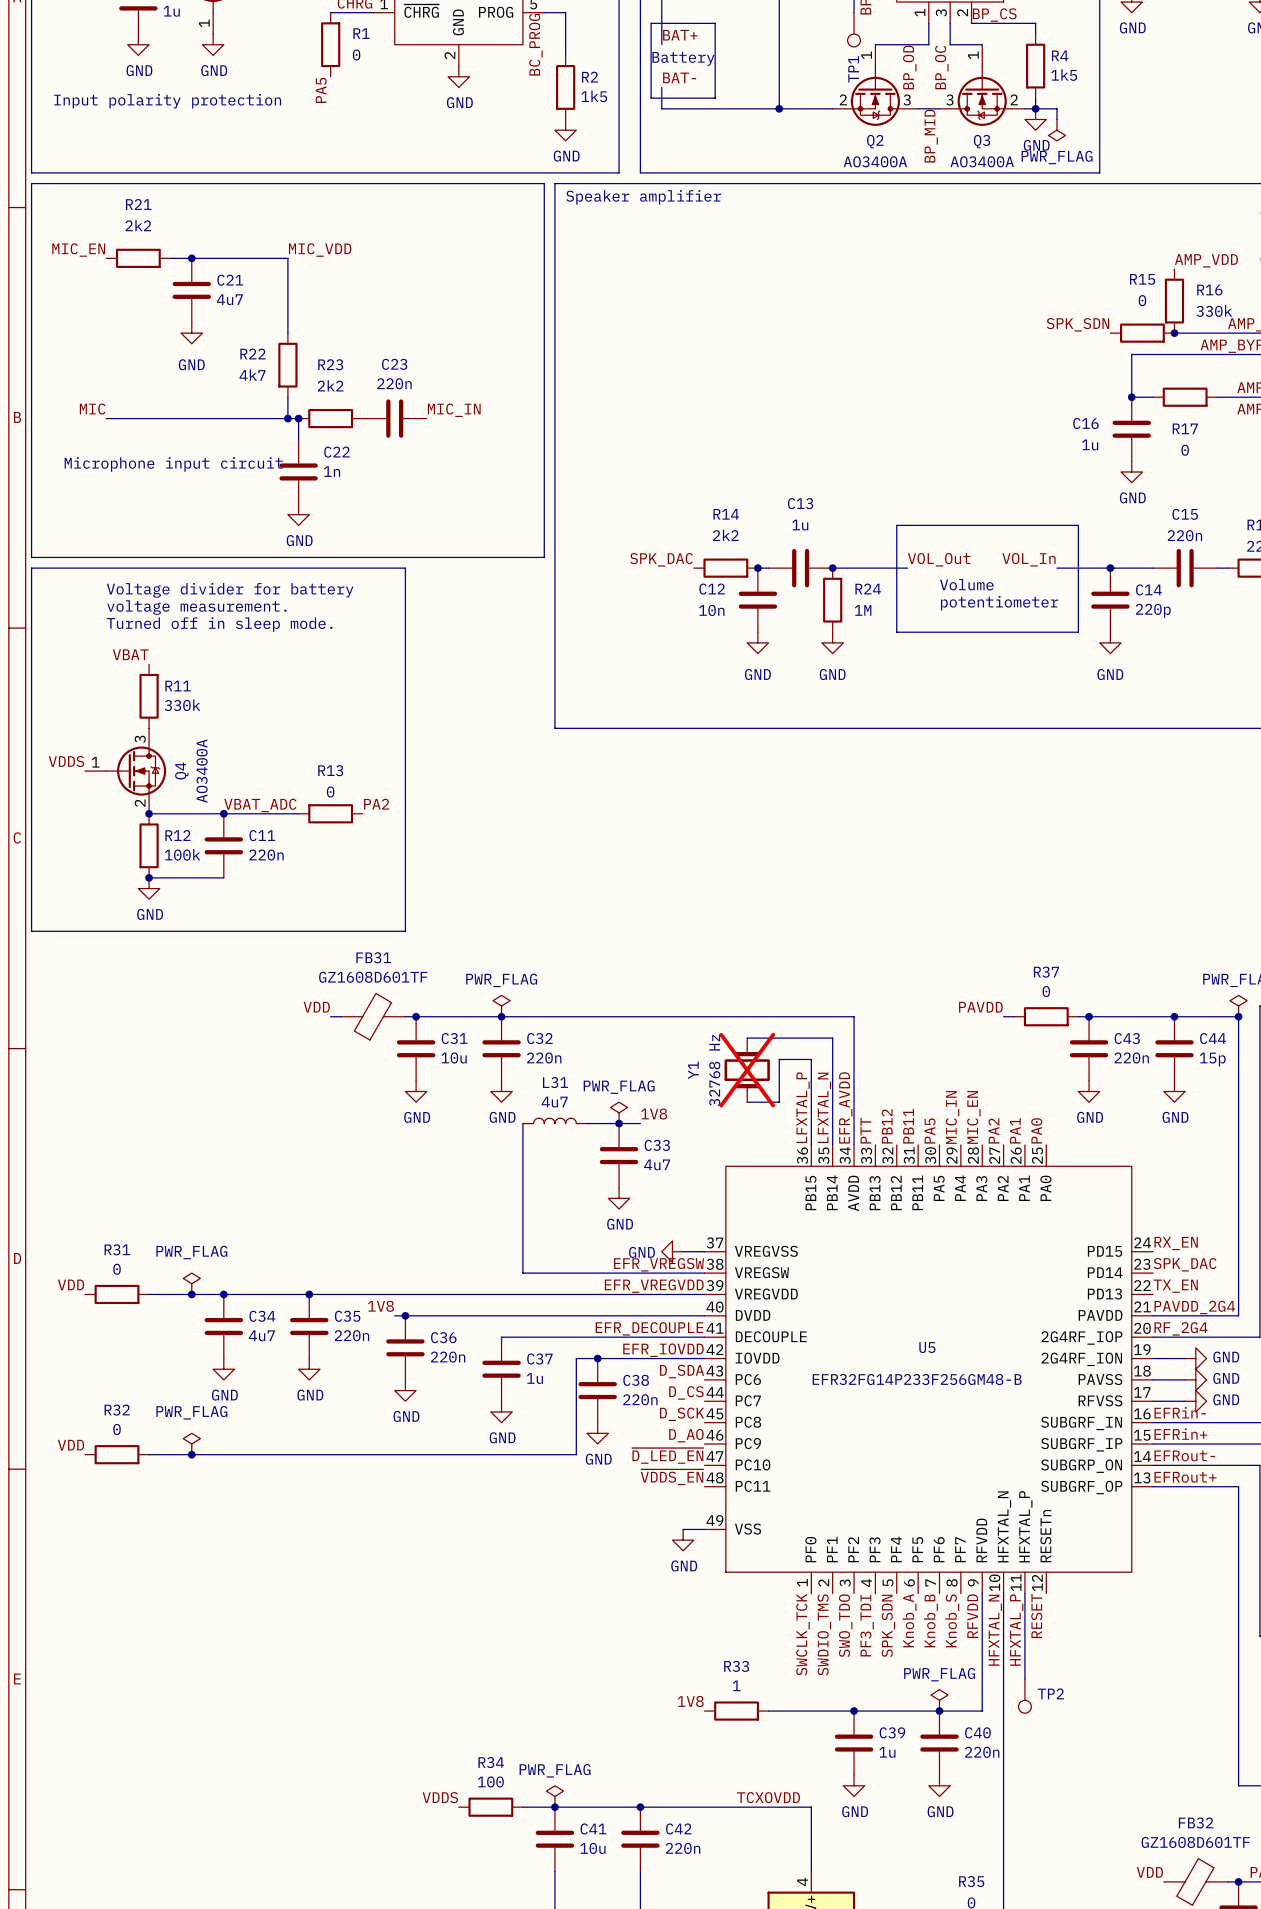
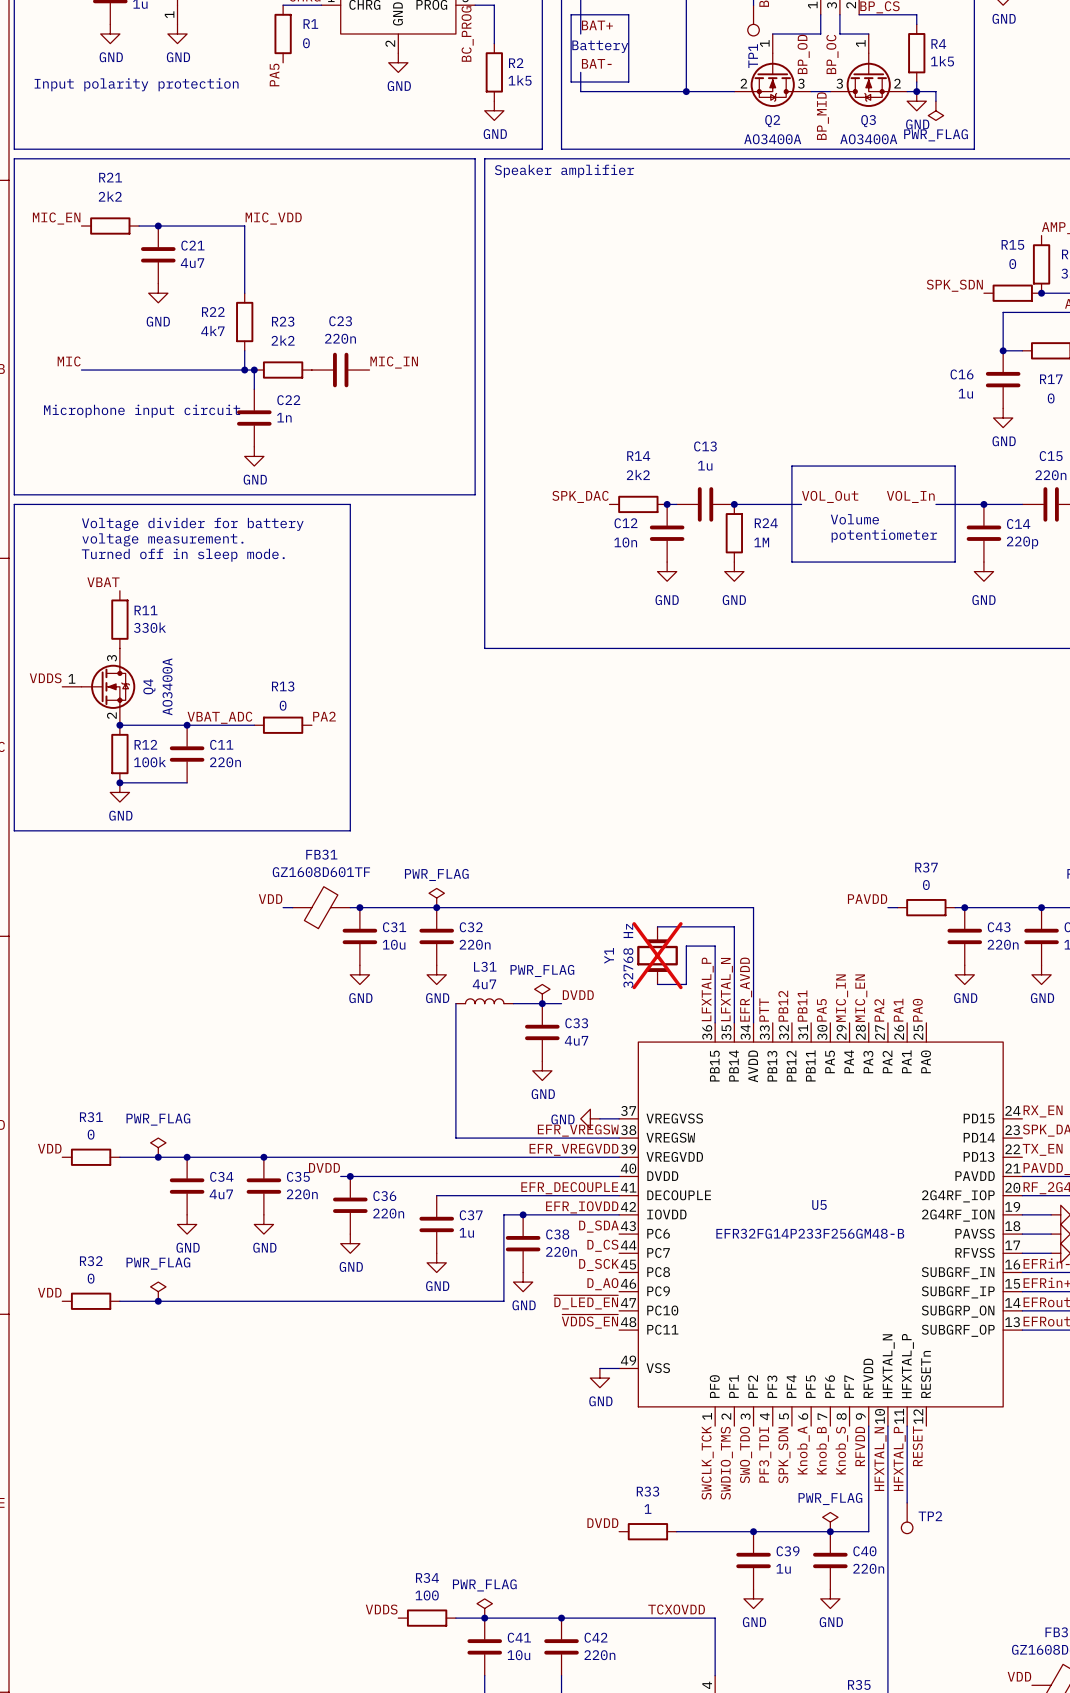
label: 1V8 (654, 1114) -> DVDD (578, 995)
label: 1V8 (380, 1306) -> DVDD (324, 1167)
label: 1V8 (690, 1701) -> DVDD (602, 1523)

